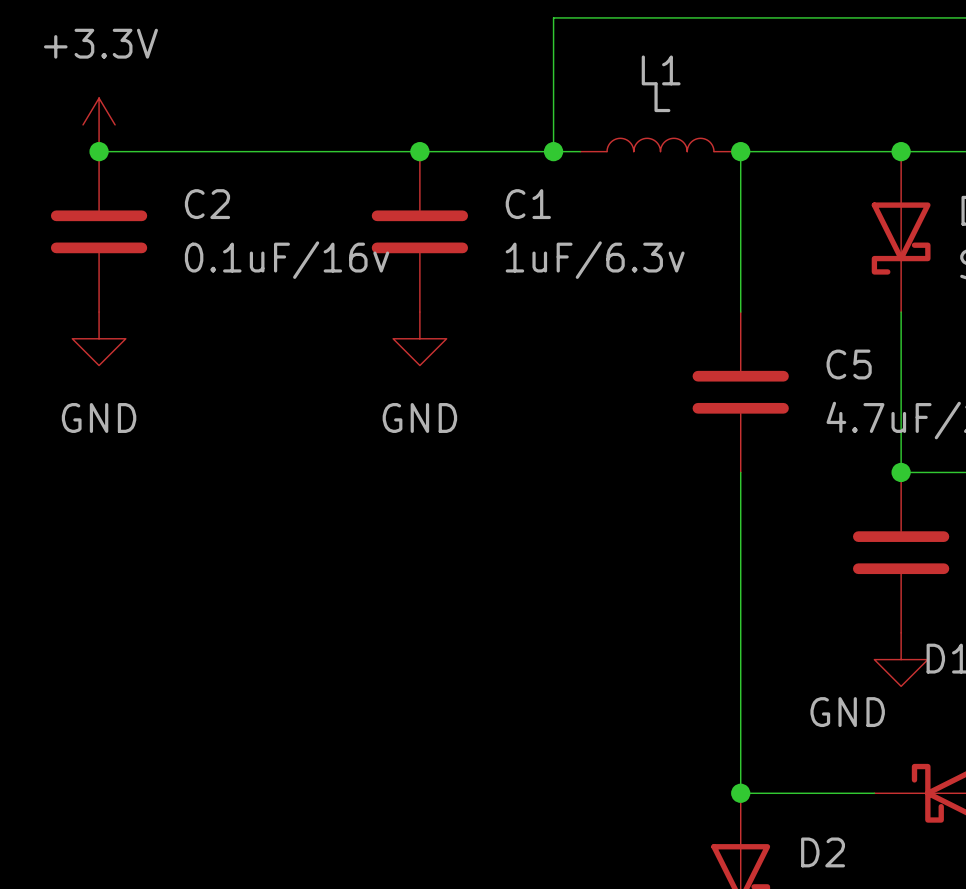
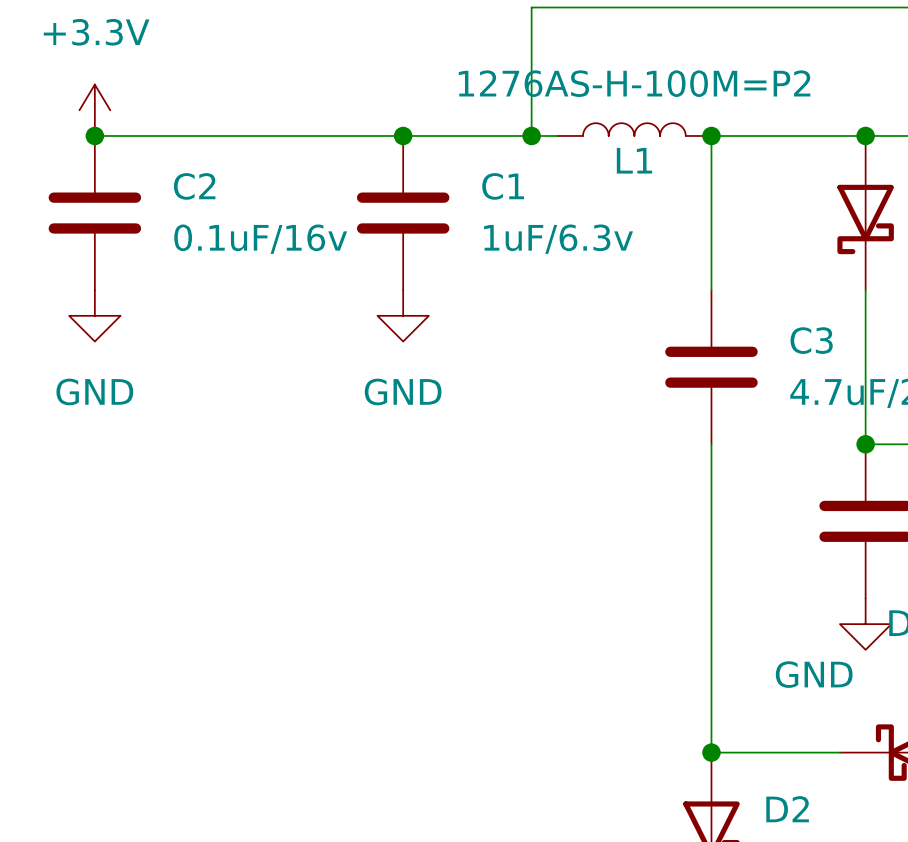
L1 name position: L1 (661, 70) -> L1 (634, 160)
L1 value: L (662, 97) -> 1276AS-H-100M=P2 (634, 83)
C5 name: C5 (849, 364) -> C3 (811, 340)

